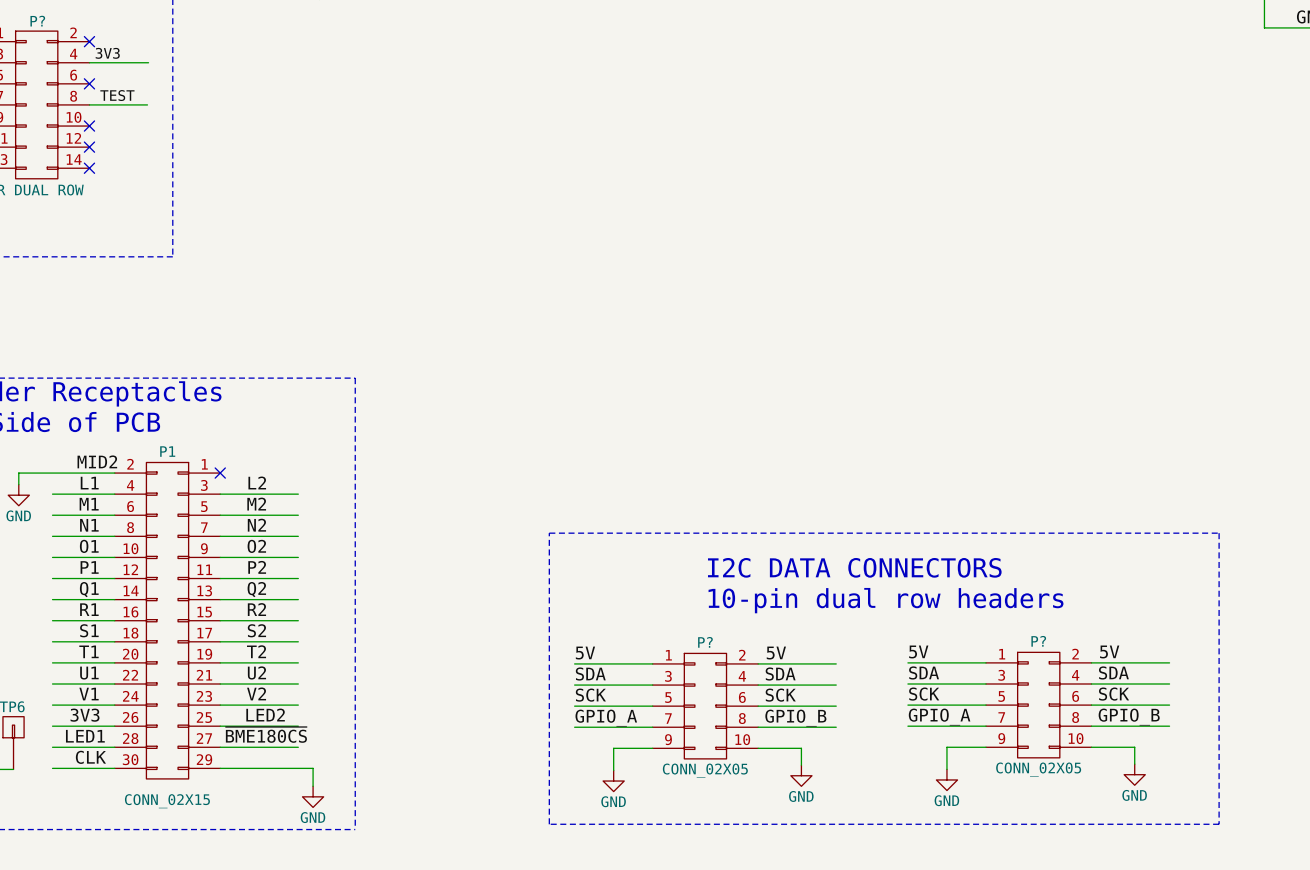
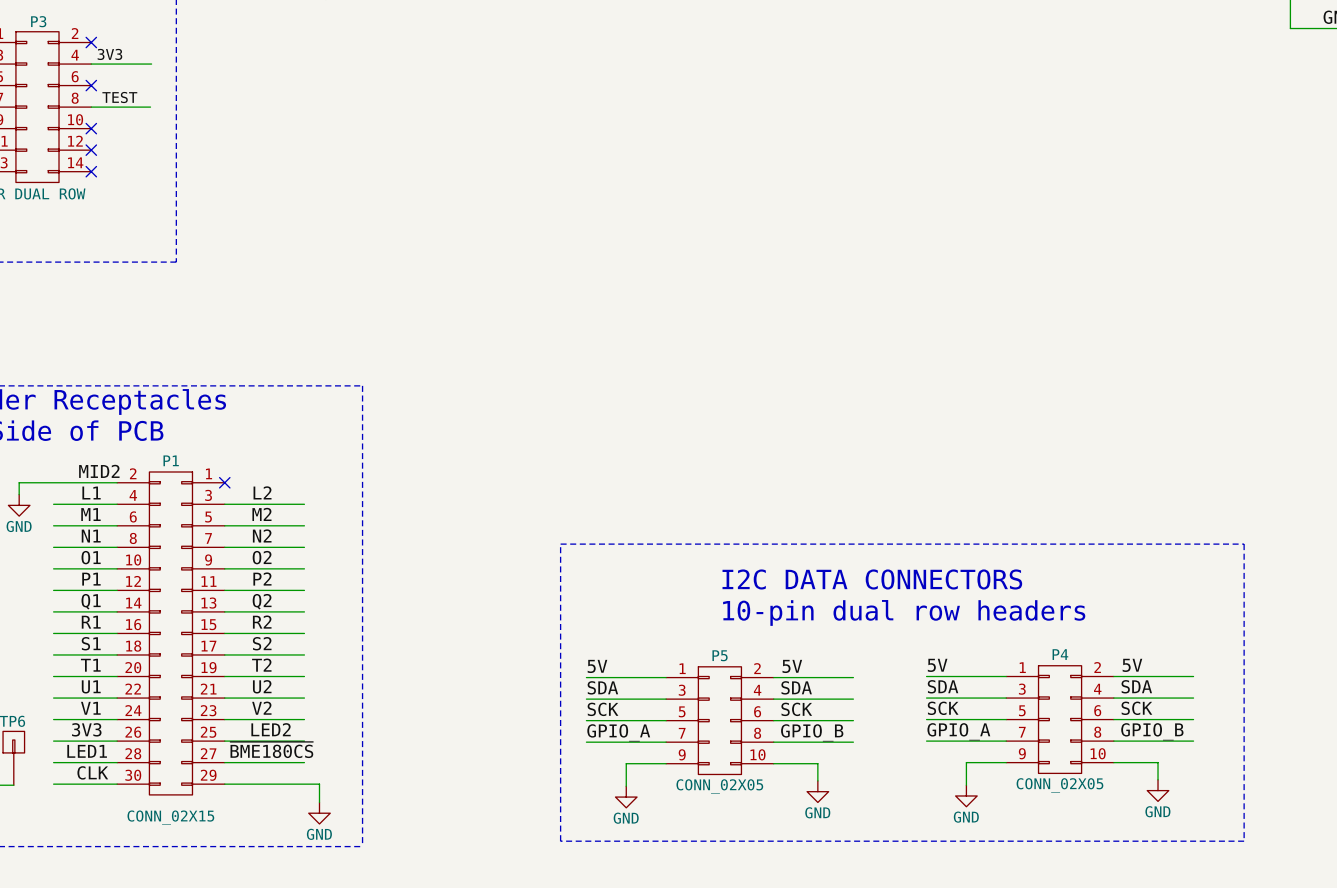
P? name: P? (37, 21) -> P3 (38, 21)
P? name: P? (1038, 641) -> P4 (1060, 654)
P? name: P? (705, 642) -> P5 (720, 655)

